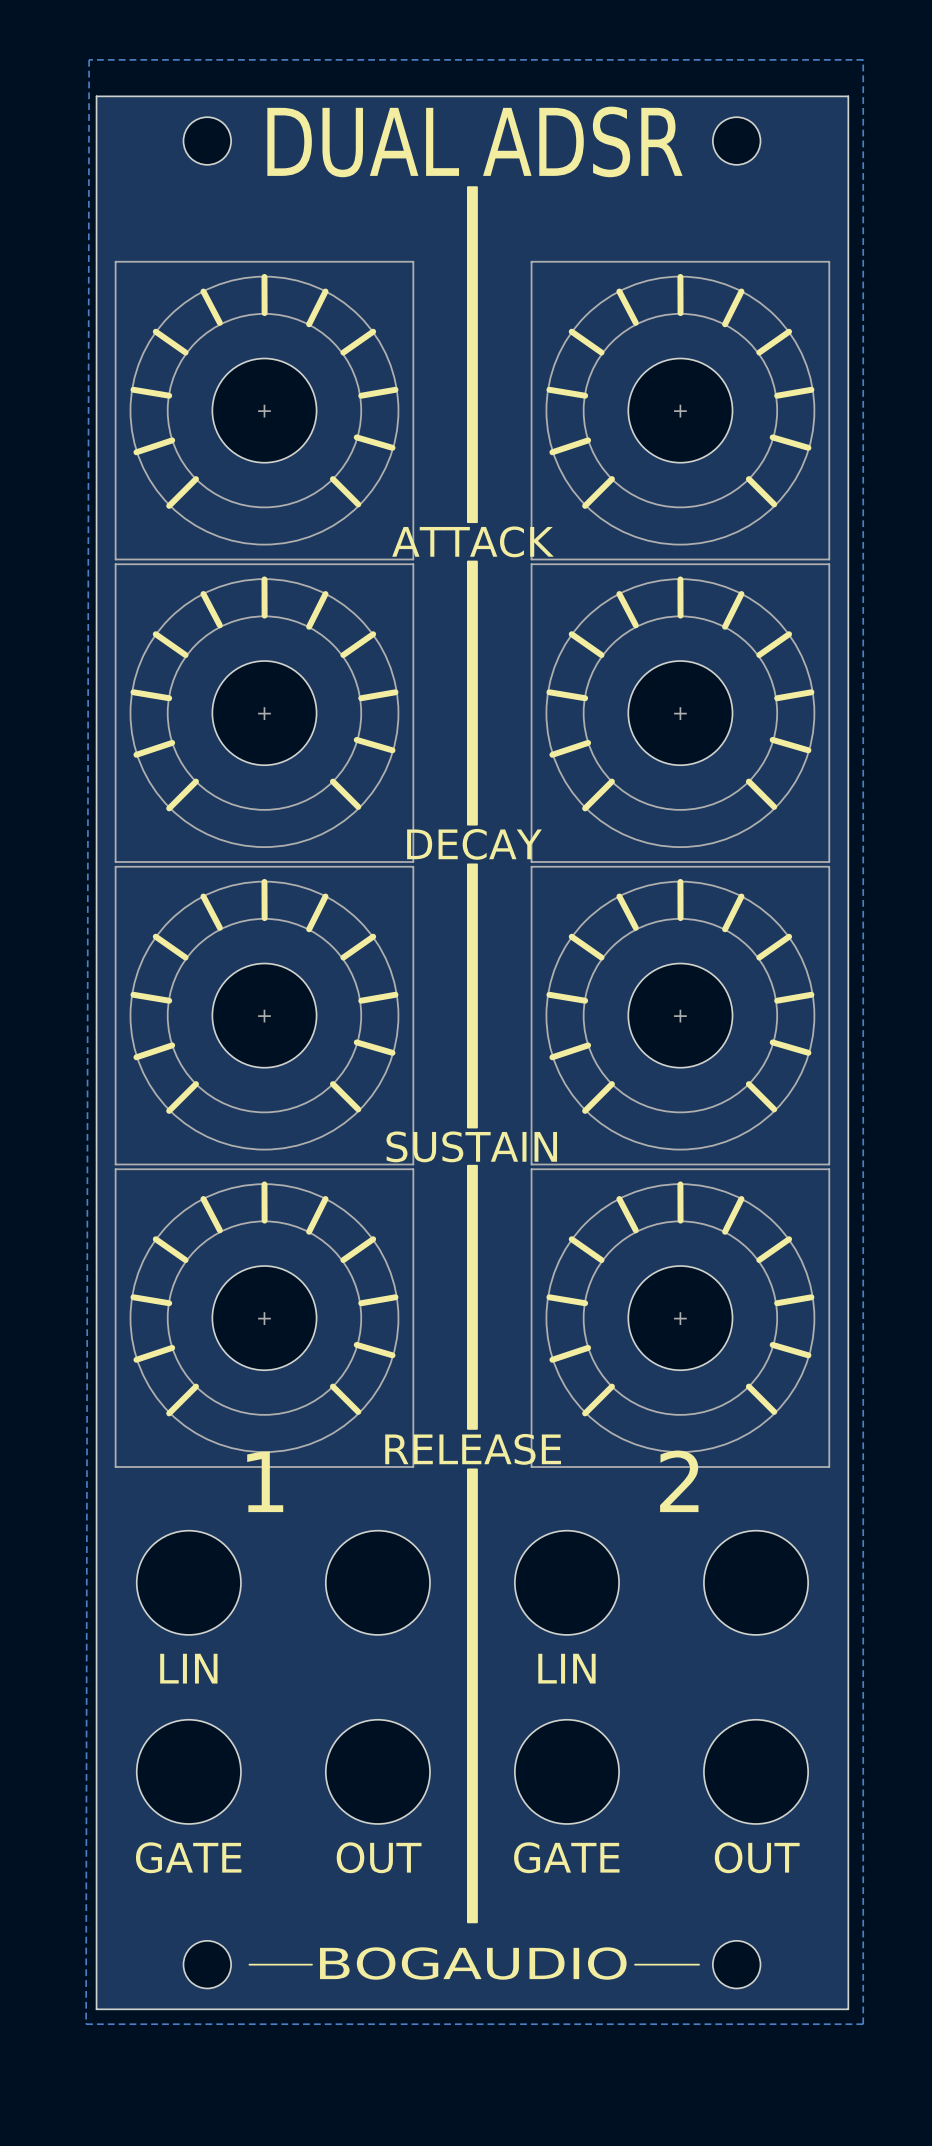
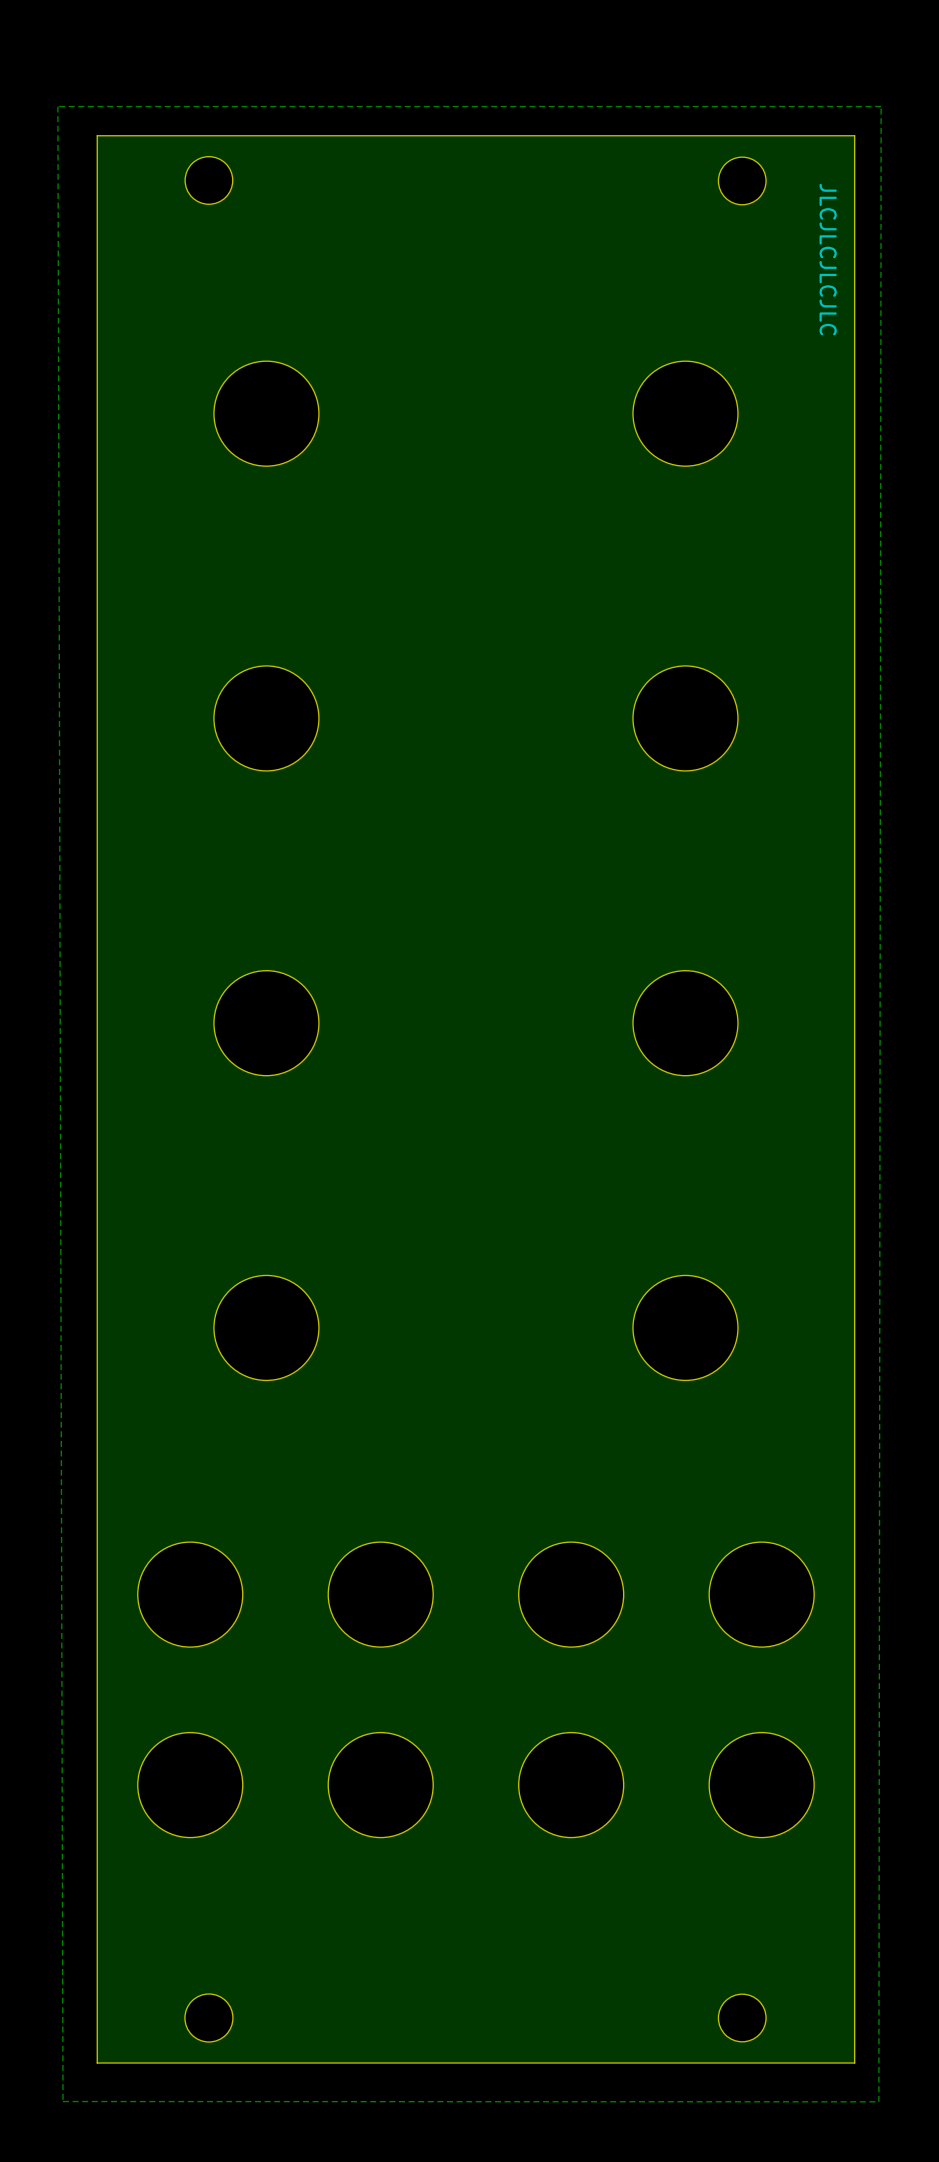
zone outline: (863, 59) (863, 2024) (86, 2024) (89, 59) (863, 59) -> (881, 106) (878, 2101) (63, 2101) (57, 106) (881, 106)
round board edge: [183, 116, 232, 166] -> none
round board edge: [712, 116, 761, 166] -> none
board edge: (848, 134) (848, 96) (96, 96) (96, 134) -> (854, 135) (97, 135)
text: DUAL ADSR (474, 141) -> none
round board edge: none -> [184, 156, 234, 205]
round board edge: none -> [718, 156, 767, 206]
drawing: [467, 186, 478, 524] -> none
text: none -> JLCJLCJLCJLC (828, 259)
part: (264, 410) -> none
part: (680, 410) -> none
text: ATTACK (473, 541) -> none
drawing: [467, 560, 478, 826] -> none
part: (264, 713) -> none
part: (680, 713) -> none
text: DECAY (474, 844) -> none
drawing: [467, 863, 478, 1129] -> none
part: (264, 1015) -> none
part: (680, 1015) -> none
text: SUSTAIN (471, 1146) -> none
drawing: [467, 1164, 478, 1430] -> none
part: (264, 1318) -> none
part: (680, 1318) -> none
text: RELEASE (473, 1449) -> none
drawing: [467, 1468, 478, 1924] -> none
text: 1 (265, 1481) -> none
text: 2 (679, 1481) -> none
text: LIN (188, 1668) -> none
text: LIN (566, 1668) -> none
text: GATE (188, 1857) -> none
text: OUT (379, 1857) -> none
text: GATE (566, 1857) -> none
text: OUT (757, 1857) -> none
round board edge: [712, 1940, 761, 1989] -> none
text: BOGAUDIO (473, 1963) -> none
round board edge position: (207, 1964) -> (208, 2018)
line: (311, 1964) (249, 1964) -> none
line: (699, 1964) (635, 1964) -> none
round board edge: none -> [718, 1993, 767, 2043]
board edge: (848, 2009) (96, 2009) -> (854, 2024) (854, 2062) (97, 2062) (97, 2024)

